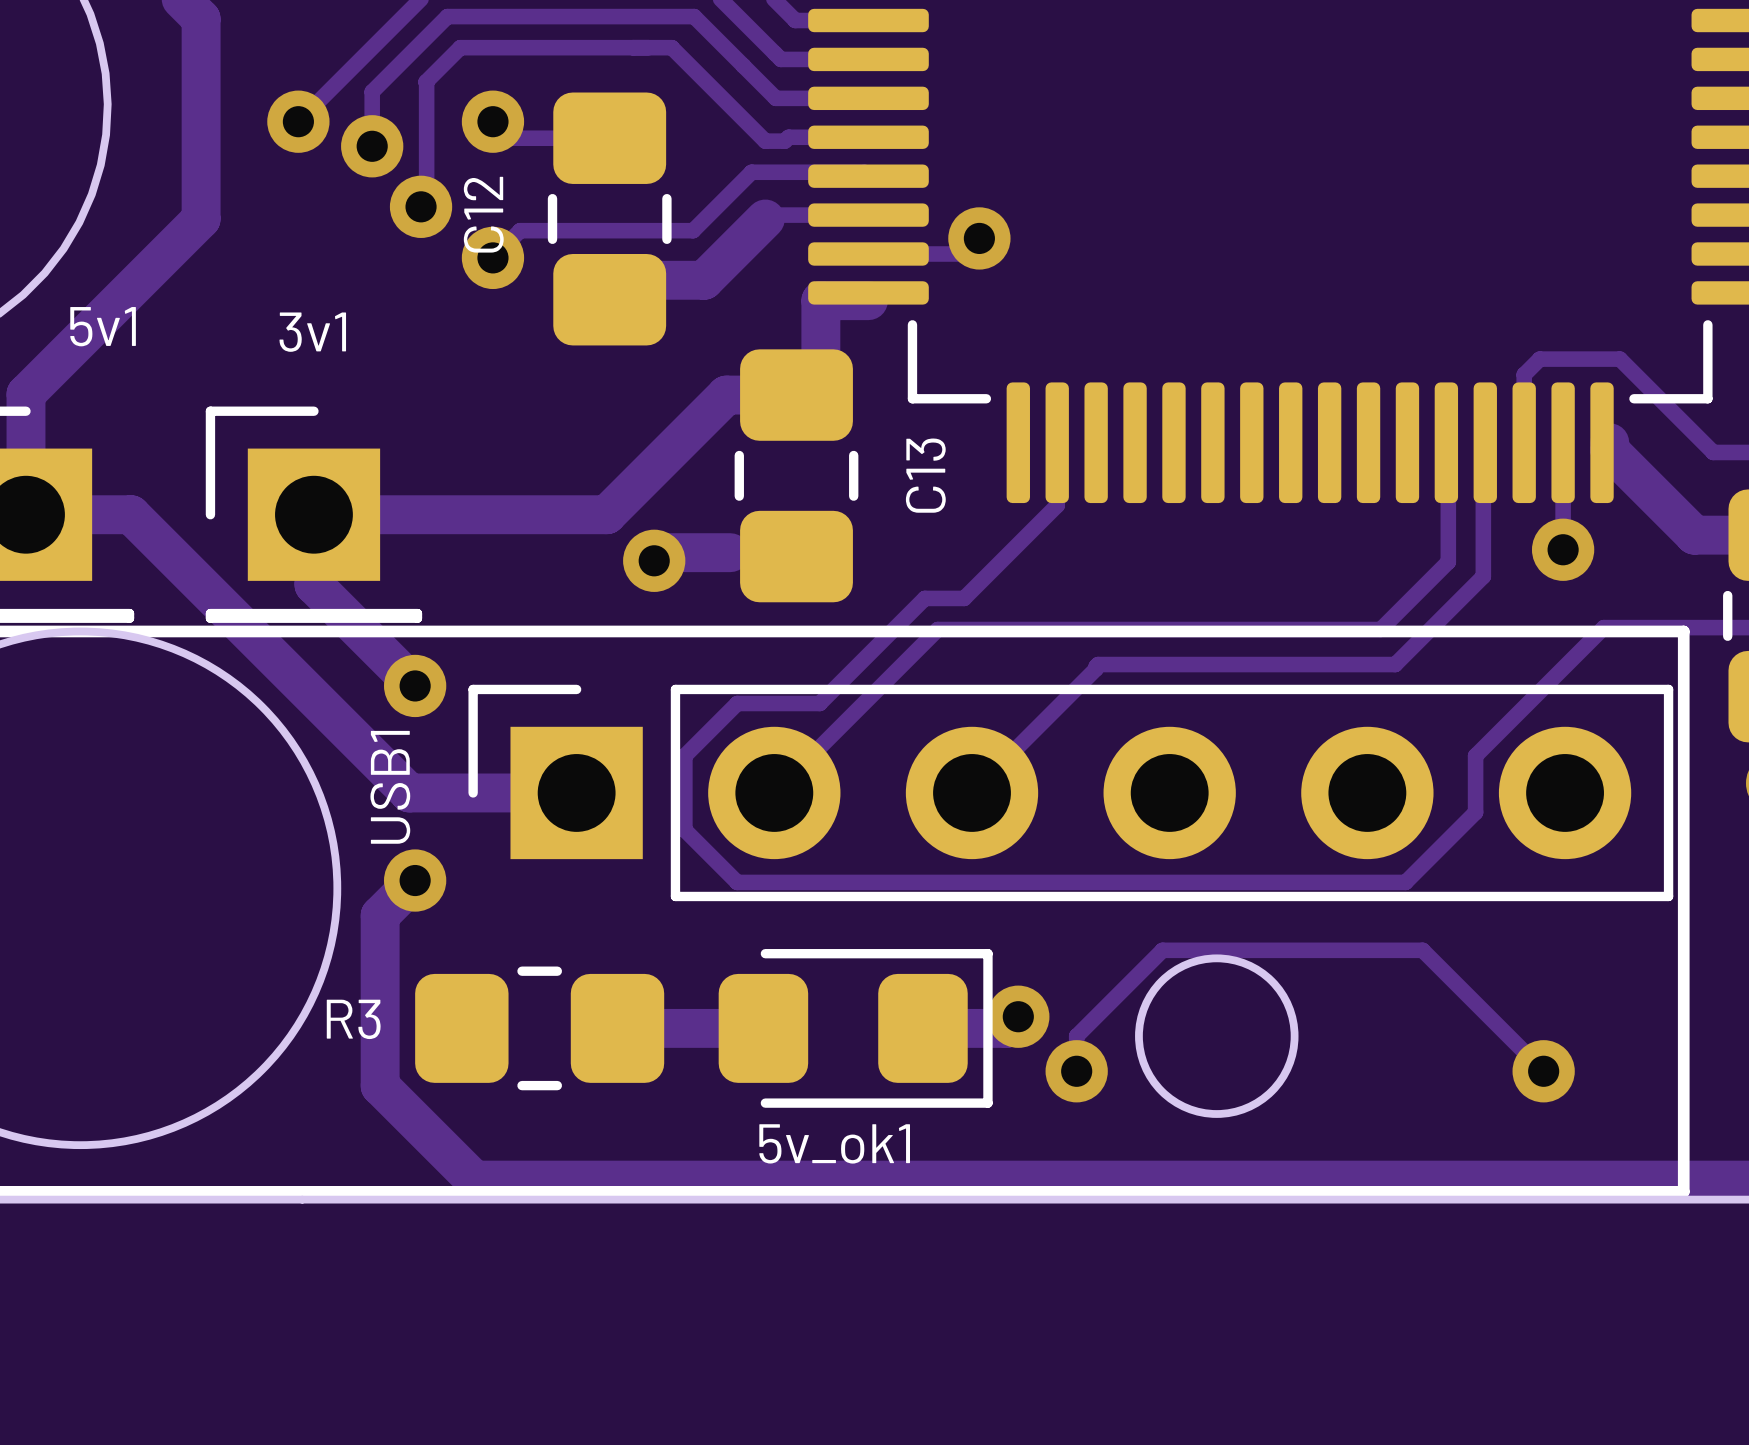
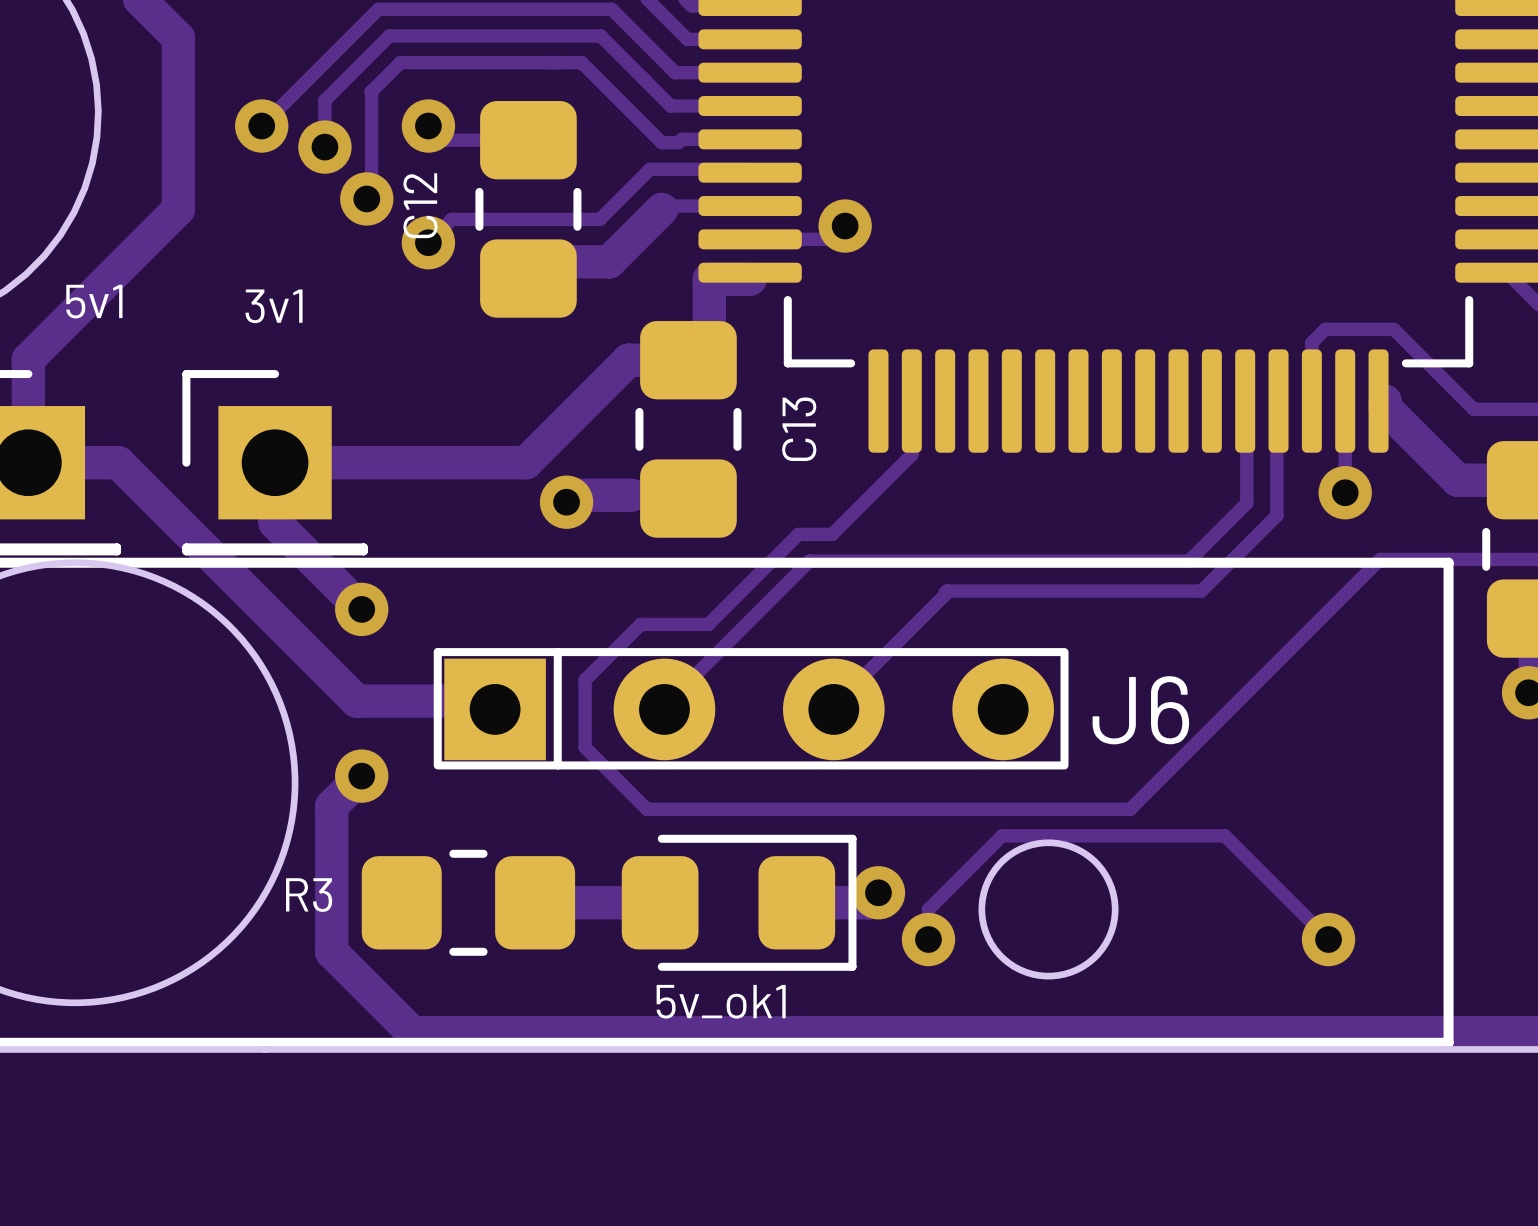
track: (740, 703) (737, 703) (684, 755) (684, 830) (737, 882) (1405, 882) (1475, 812) (1475, 755) -> (640, 624) (585, 680) (585, 747) (646, 809) (1130, 809) (1270, 669)
USB1: (1070, 792) -> none
J6: none -> (751, 708)

